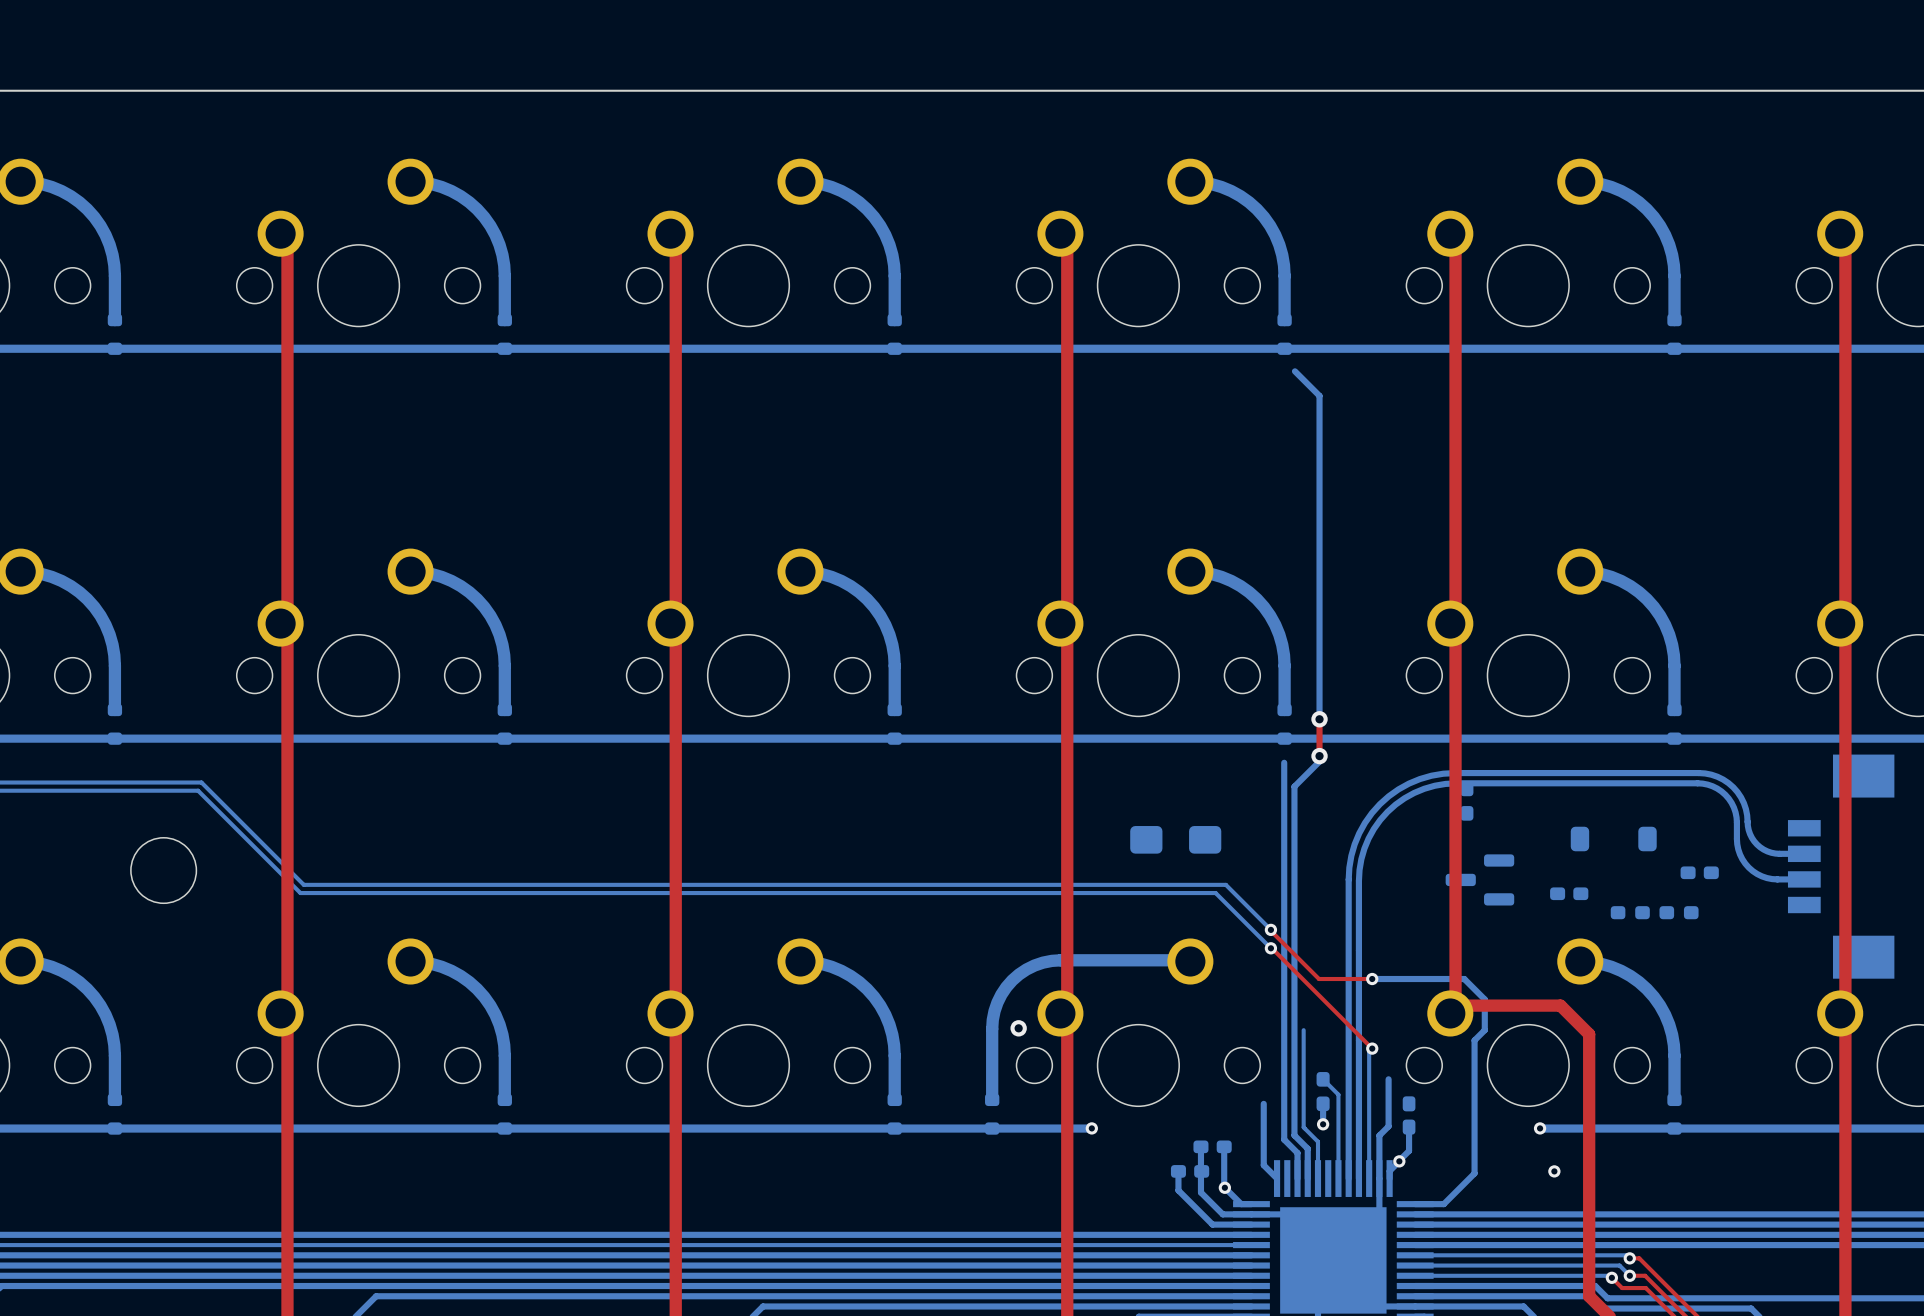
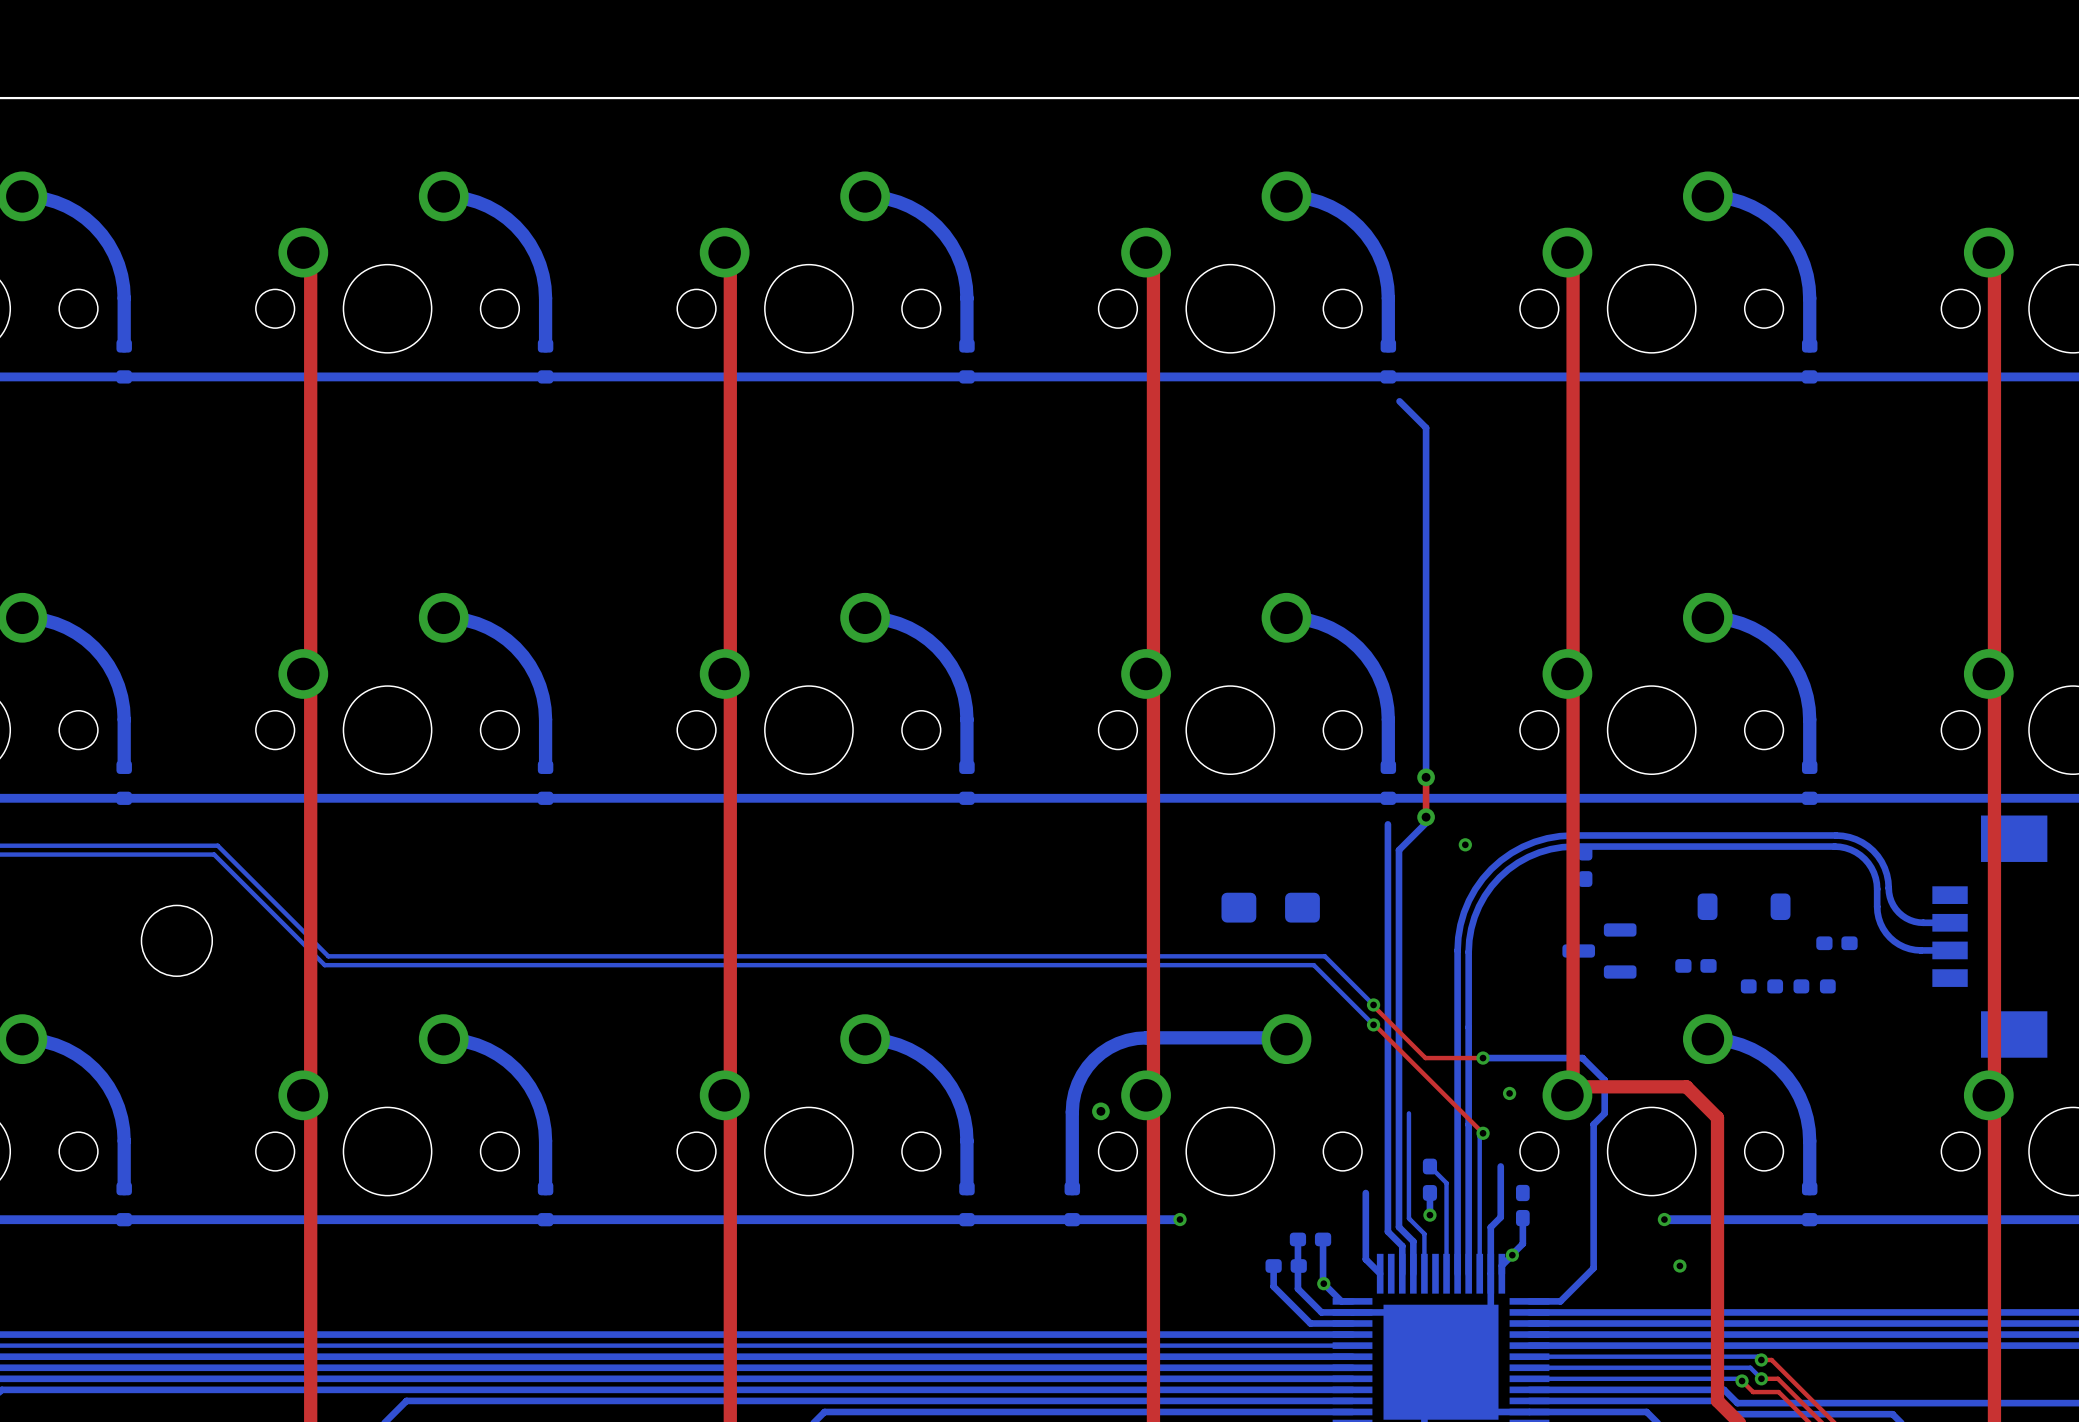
via: none -> (1465, 844)
via: none -> (1509, 1093)

